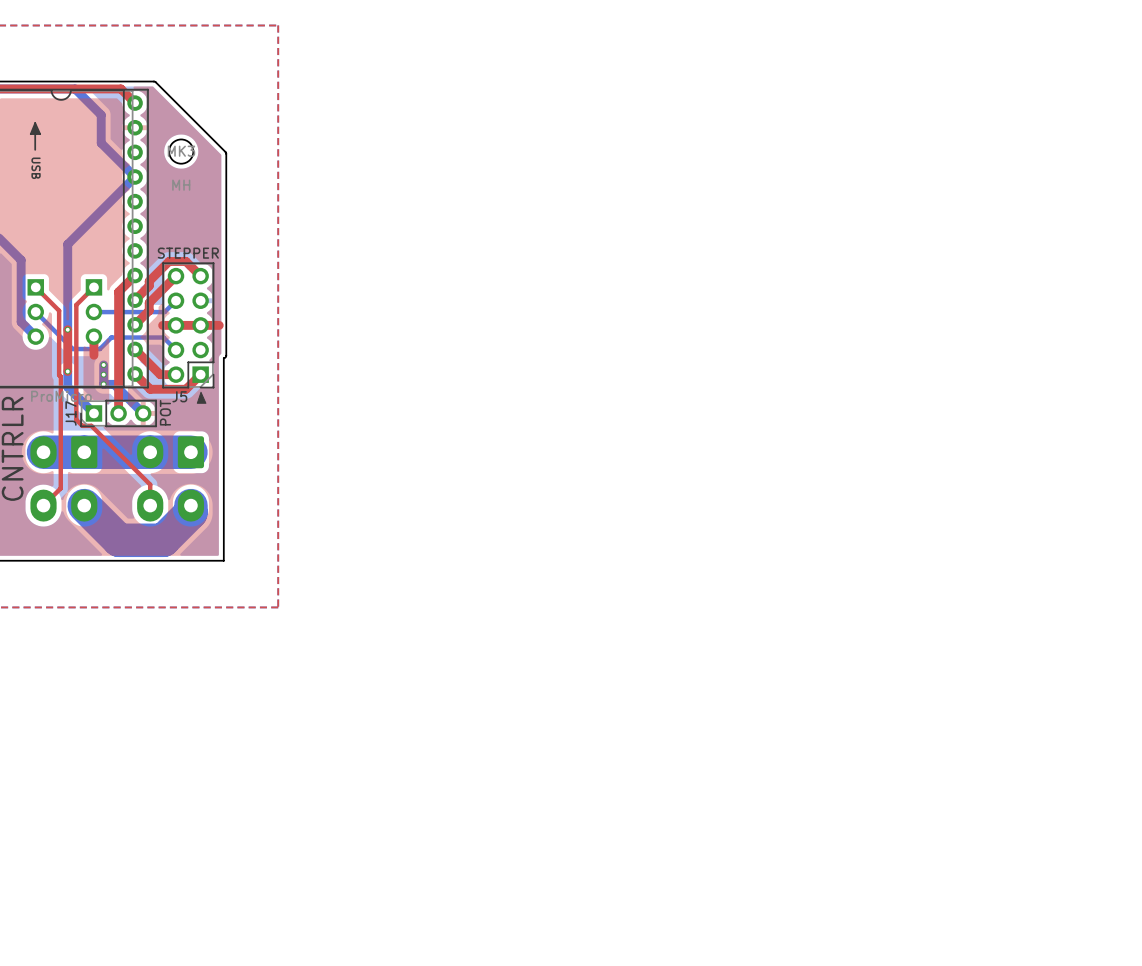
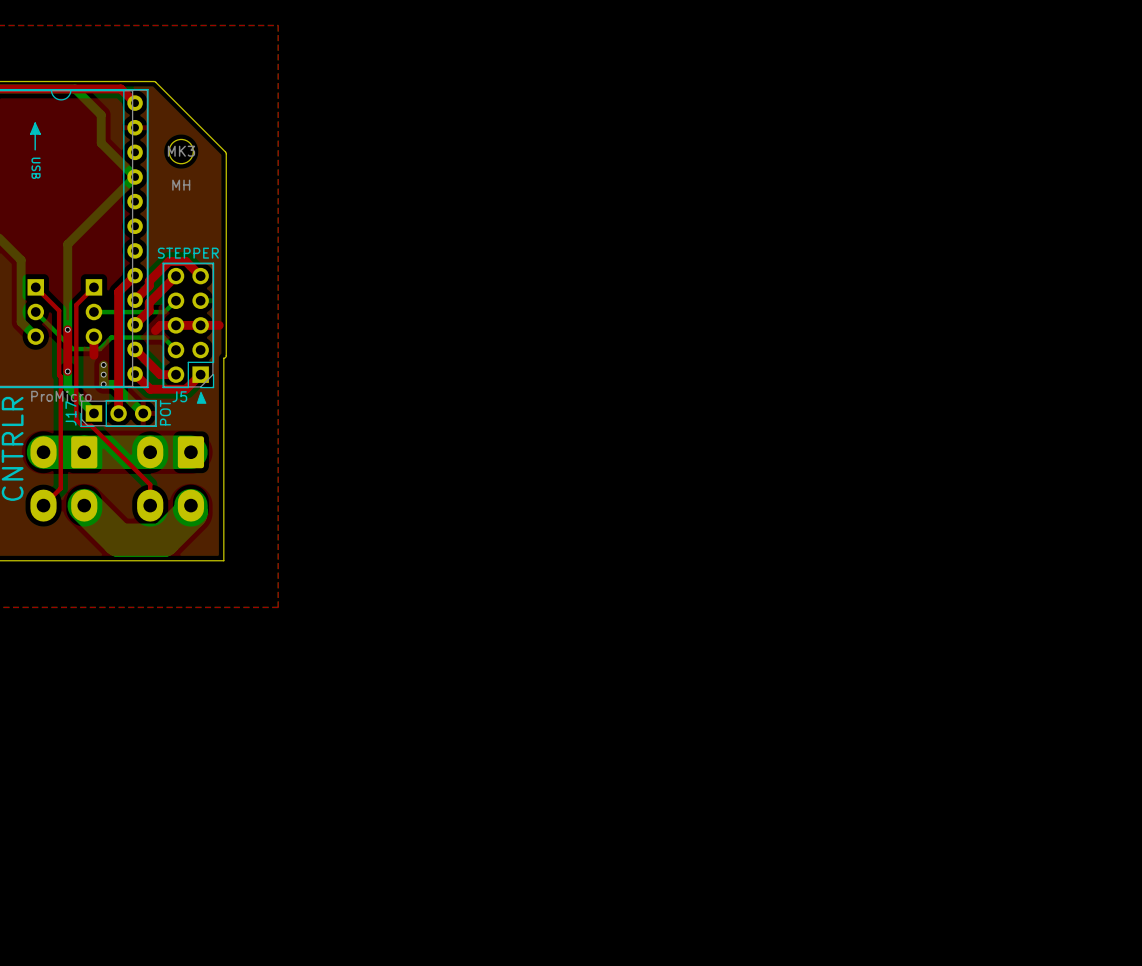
top track: none -> (162, 325) (155, 330)

